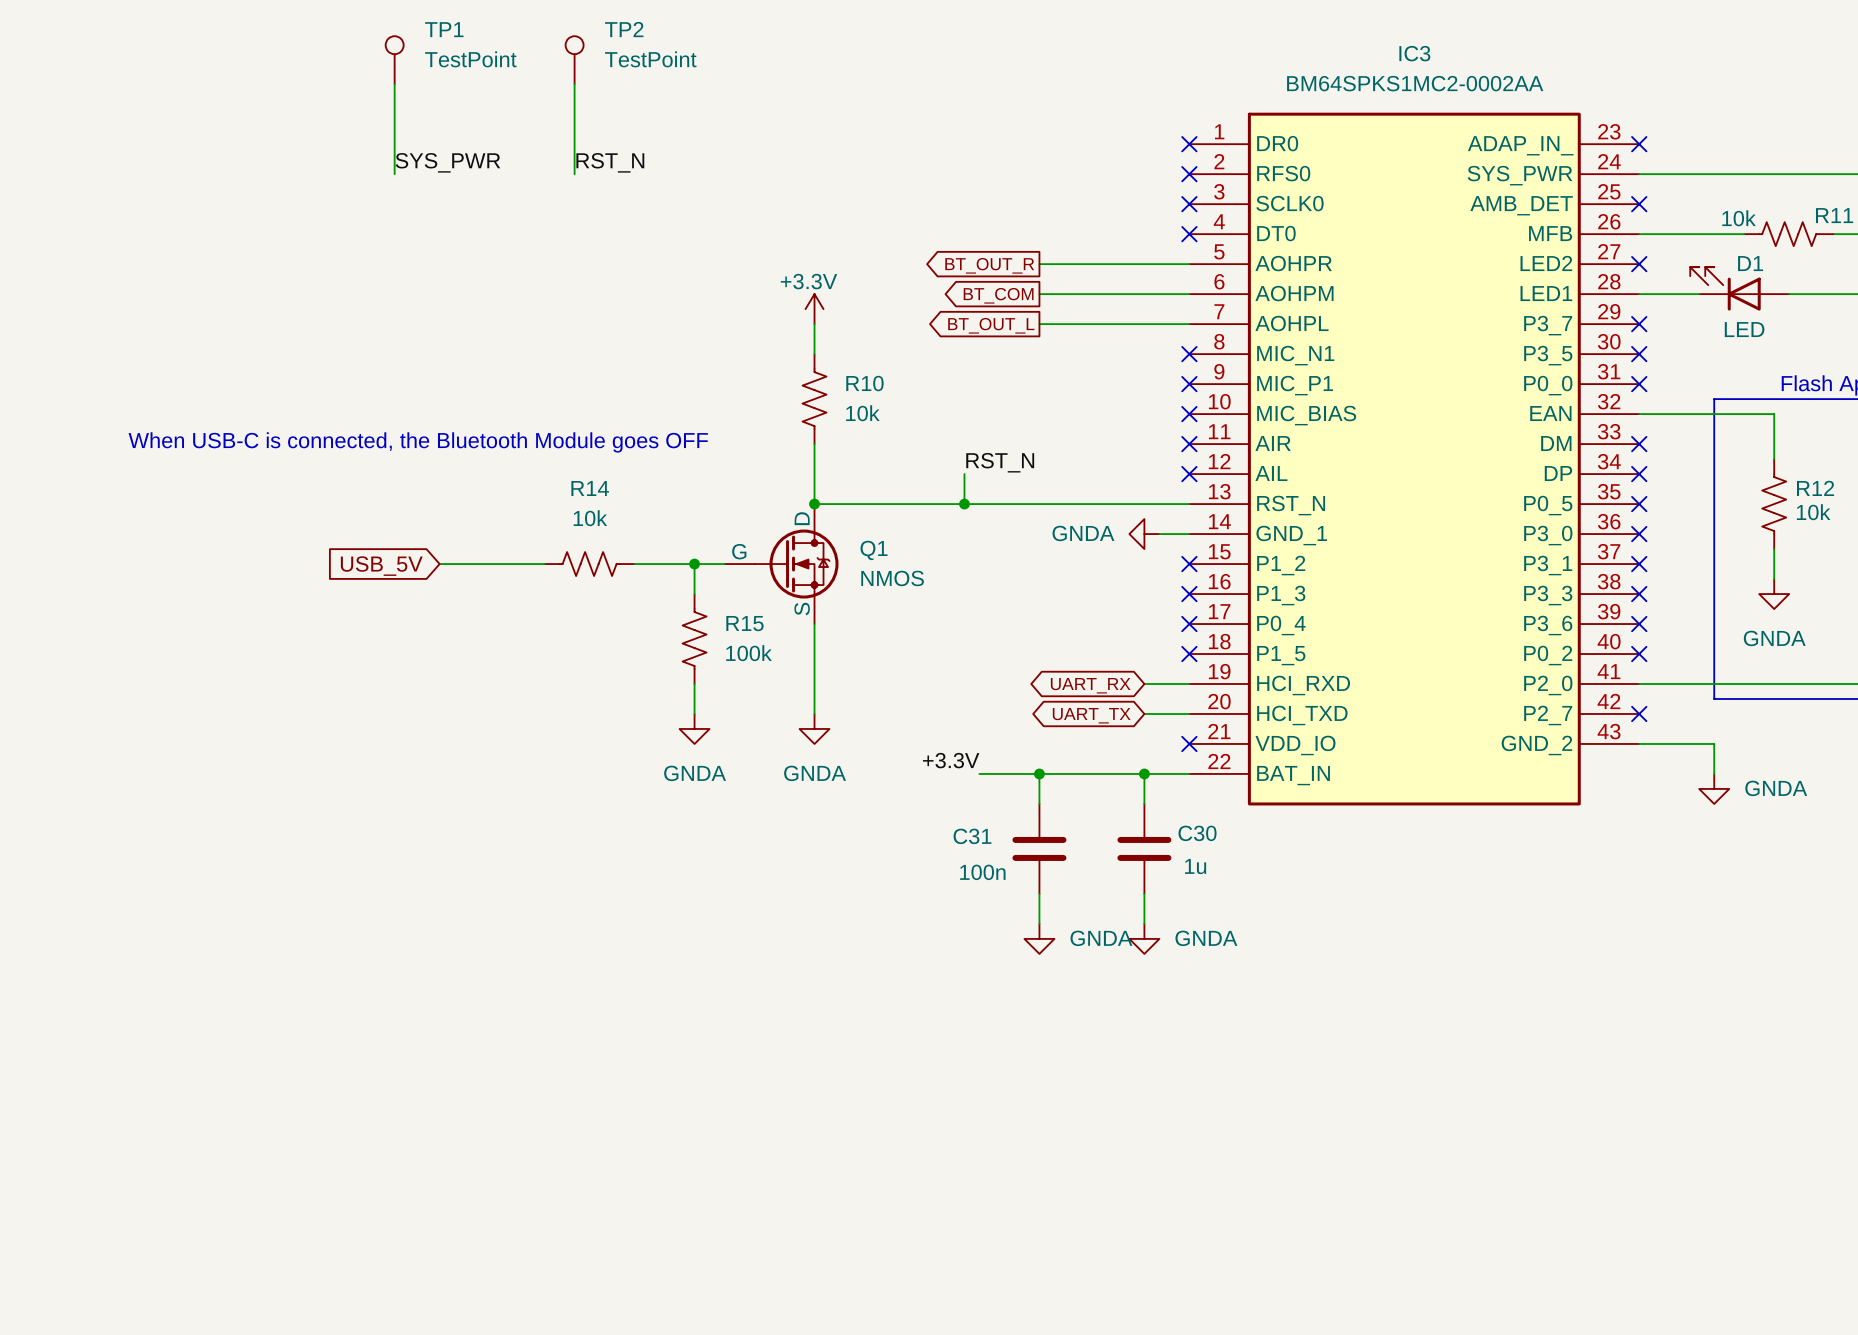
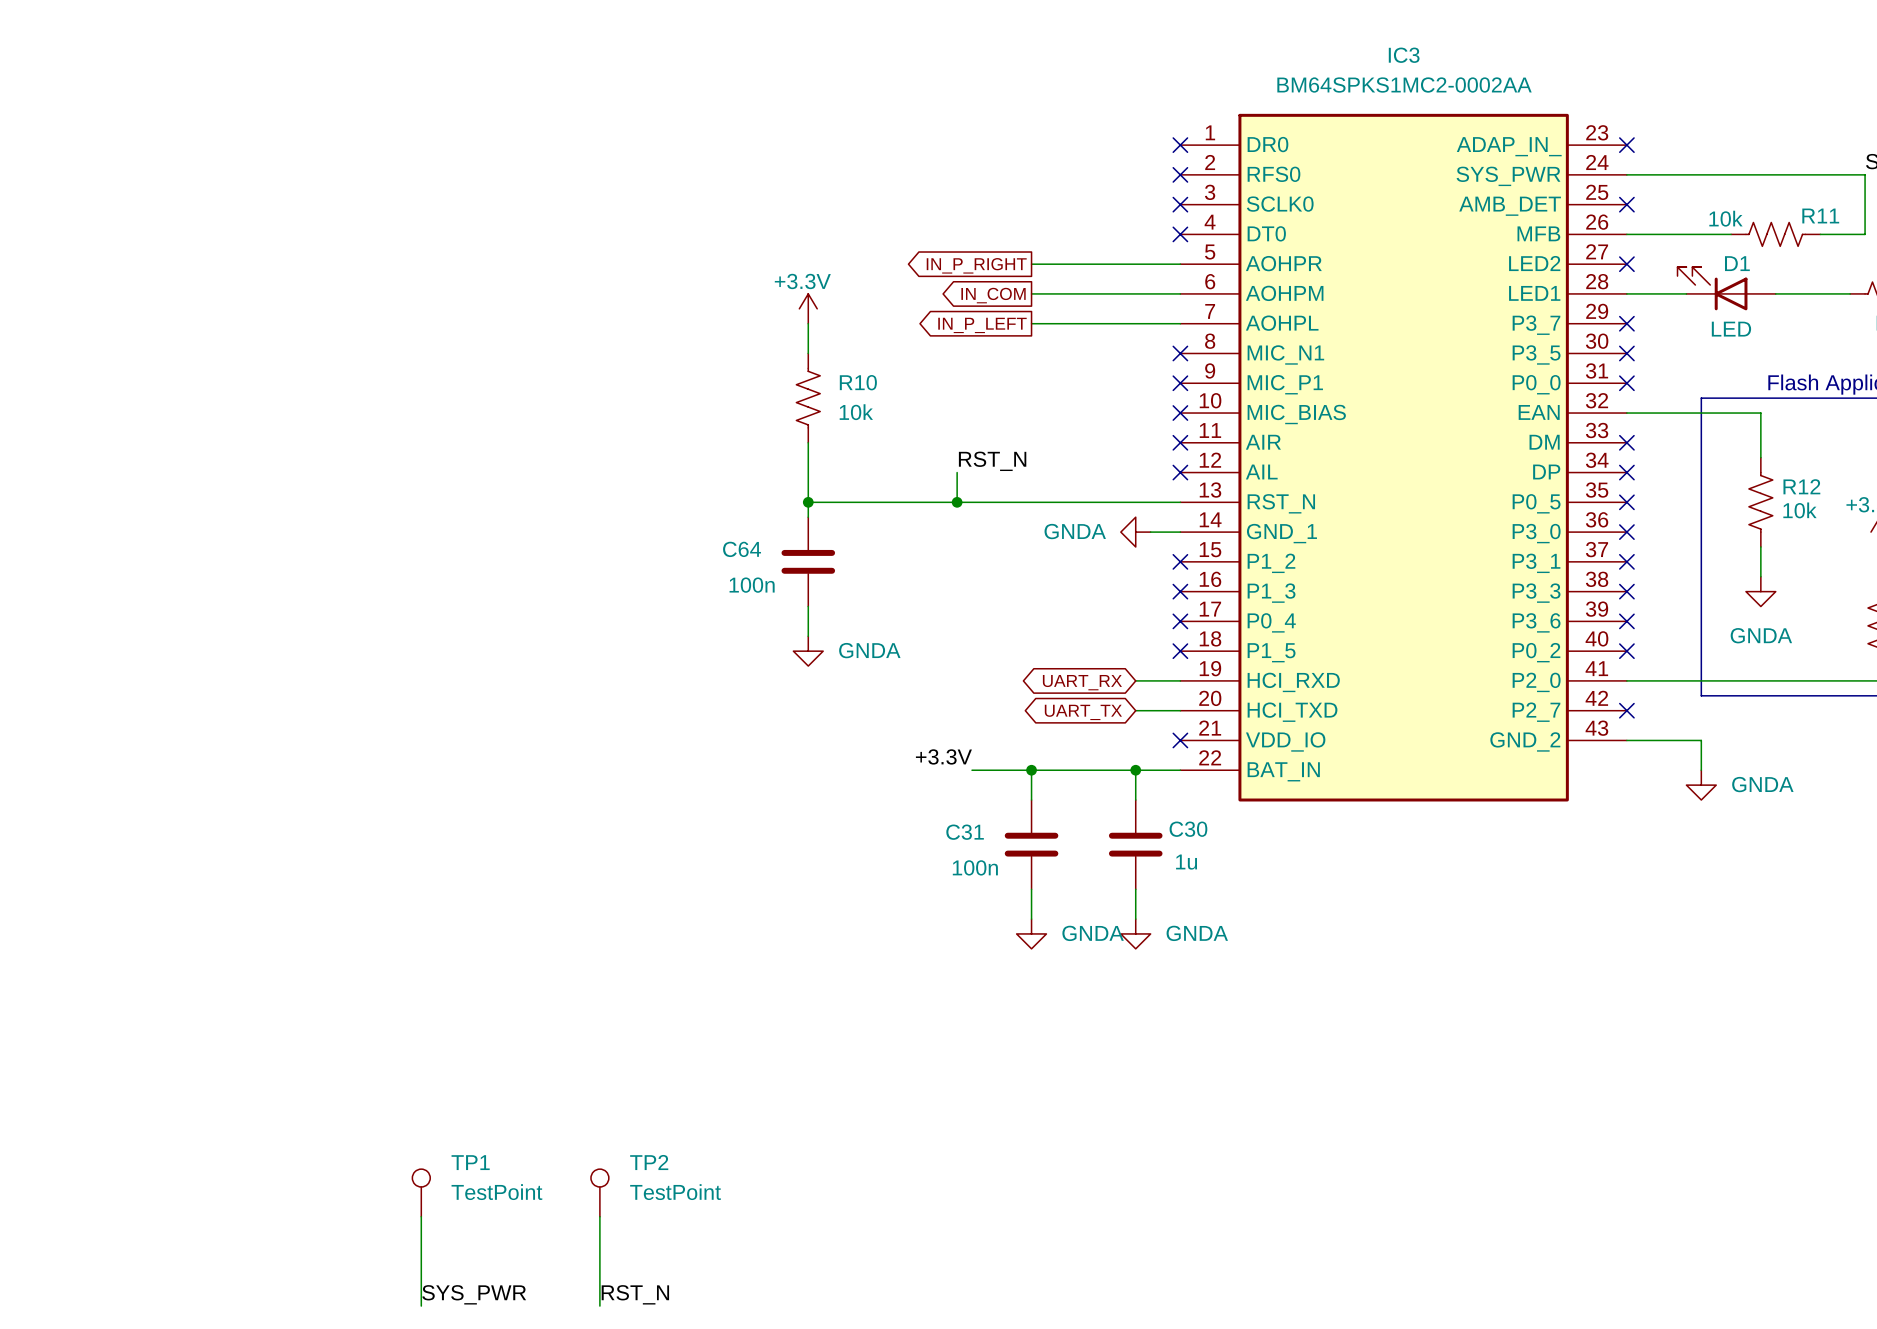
TP1 position: (394, 60) -> (421, 1192)
TP2 position: (574, 60) -> (599, 1192)
wire: (394, 84) (394, 174) -> none
wire: (574, 84) (574, 174) -> none
label: SYS_PWR (447, 162) -> none
label: RST_N (610, 162) -> none
global label: BT_OUT_R (989, 265) -> IN_P_RIGHT (976, 265)
global label: BT_COM (998, 295) -> IN_COM (993, 295)
global label: BT_OUT_L (991, 325) -> IN_P_LEFT (982, 325)
text: When USB-C is connected, the Bluetooth Module goes OFF (418, 442) -> none
wire: (439, 564) (544, 564) -> none
R14: 10k (589, 564) -> none
wire: (634, 564) (724, 564) -> none
wire: (694, 564) (694, 594) -> none
junction: (694, 564) -> none
Q1: NMOS (781, 564) -> none
C64: none -> 100n (808, 561)
global label: USB_5V (381, 566) -> none
R15: 100k (694, 639) -> none
wire: (814, 639) (814, 713) -> none
power symbol: none -> GNDA (808, 651)
wire: (694, 684) (694, 713) -> none
power symbol: GNDA (694, 728) -> none
power symbol: GNDA (814, 728) -> none
wire: none -> (421, 1216) (421, 1306)
wire: none -> (599, 1216) (599, 1306)
label: none -> SYS_PWR (474, 1294)
label: none -> RST_N (635, 1294)

